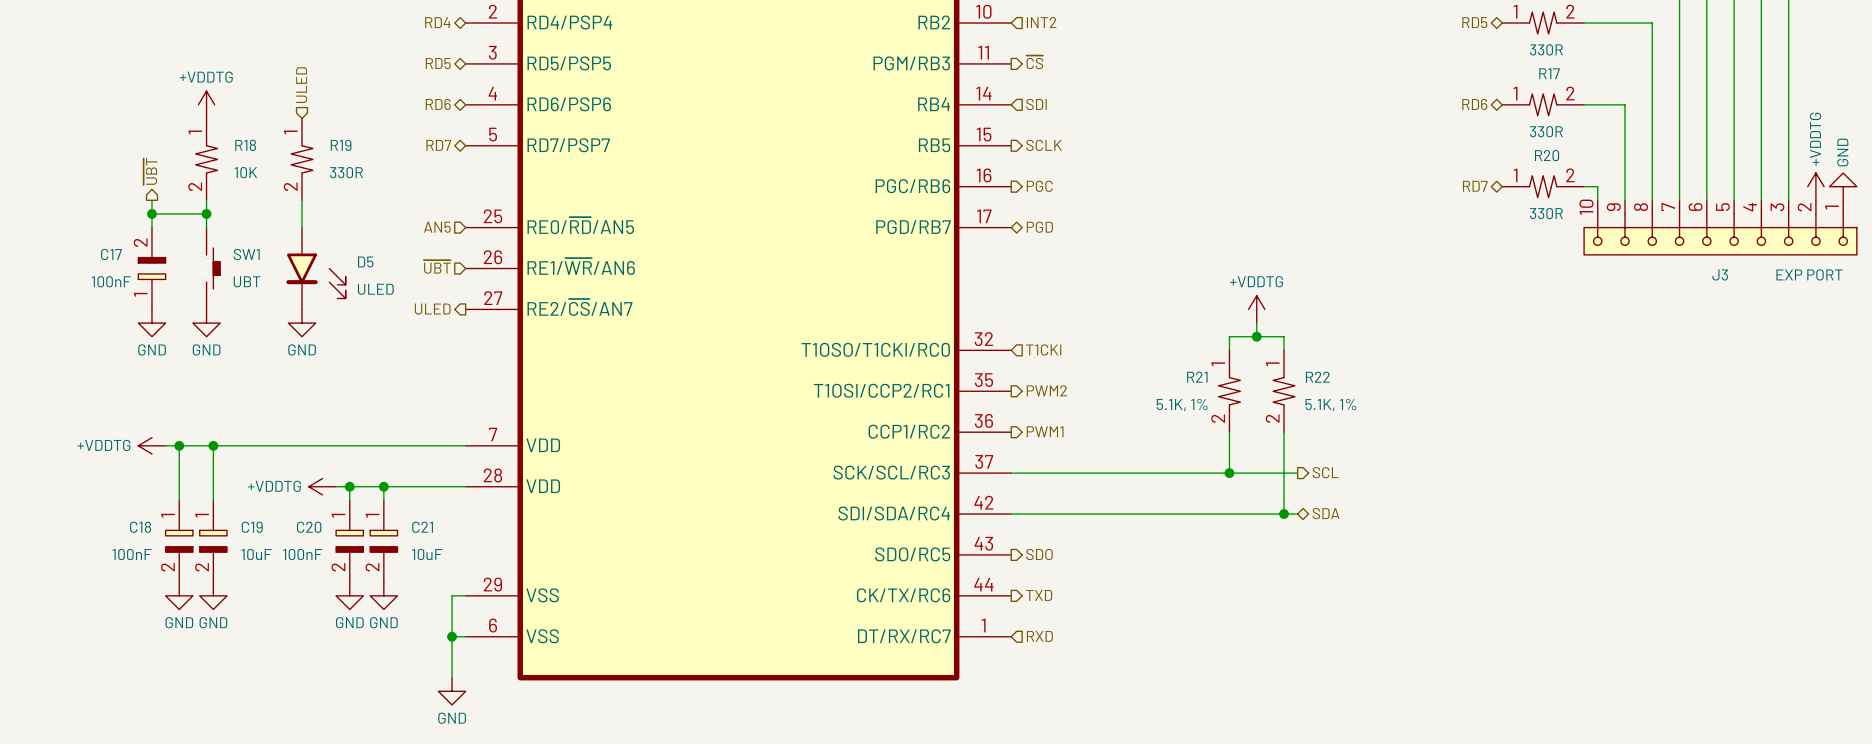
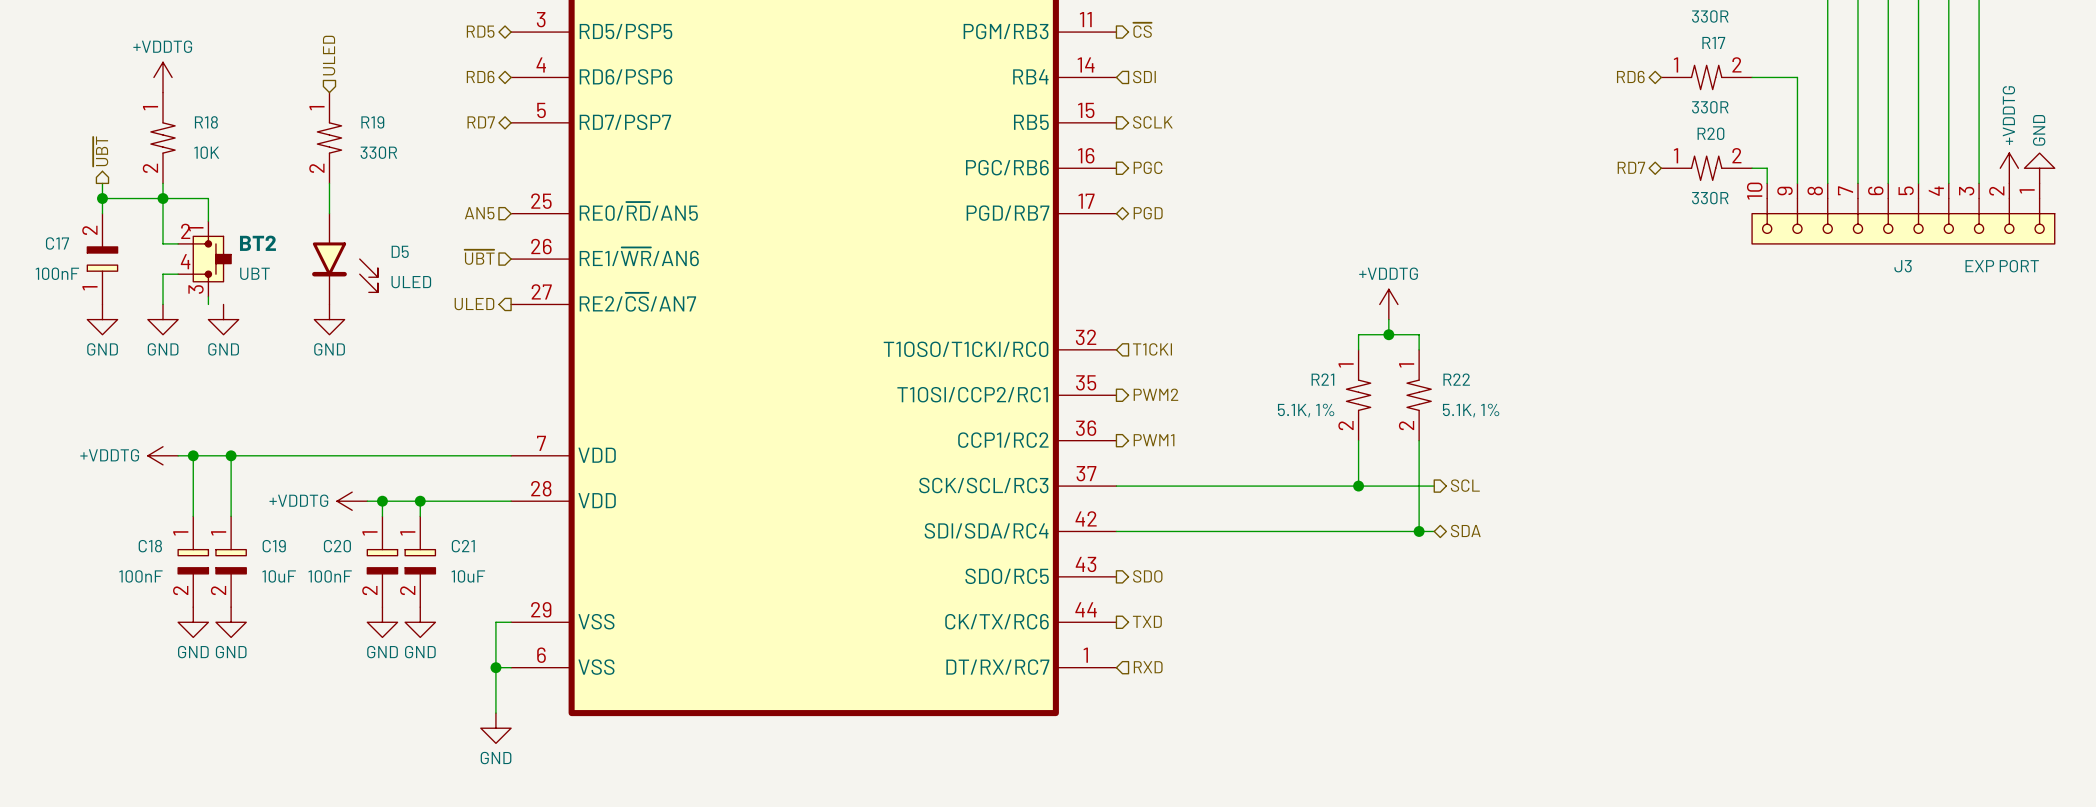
power symbol position: +VDDTG (206, 104) -> +VDDTG (163, 77)
R18 position: (206, 159) -> (163, 137)
hierarchical label position: ~{UBT} (150, 171) -> ~{UBT} (100, 151)
wire: (206, 200) (206, 227) -> (102, 183) (102, 213)
wire: none -> (102, 198) (163, 198)
junction: none -> (102, 198)
wire: (192, 213) (206, 213) -> (208, 198) (208, 221)
junction: (206, 213) -> none
C17 position: (151, 268) -> (102, 259)
BT2: none -> UBT (204, 259)
SW1: UBT (211, 268) -> none
wire: none -> (208, 296) (208, 304)
power symbol: none -> GND (102, 319)

